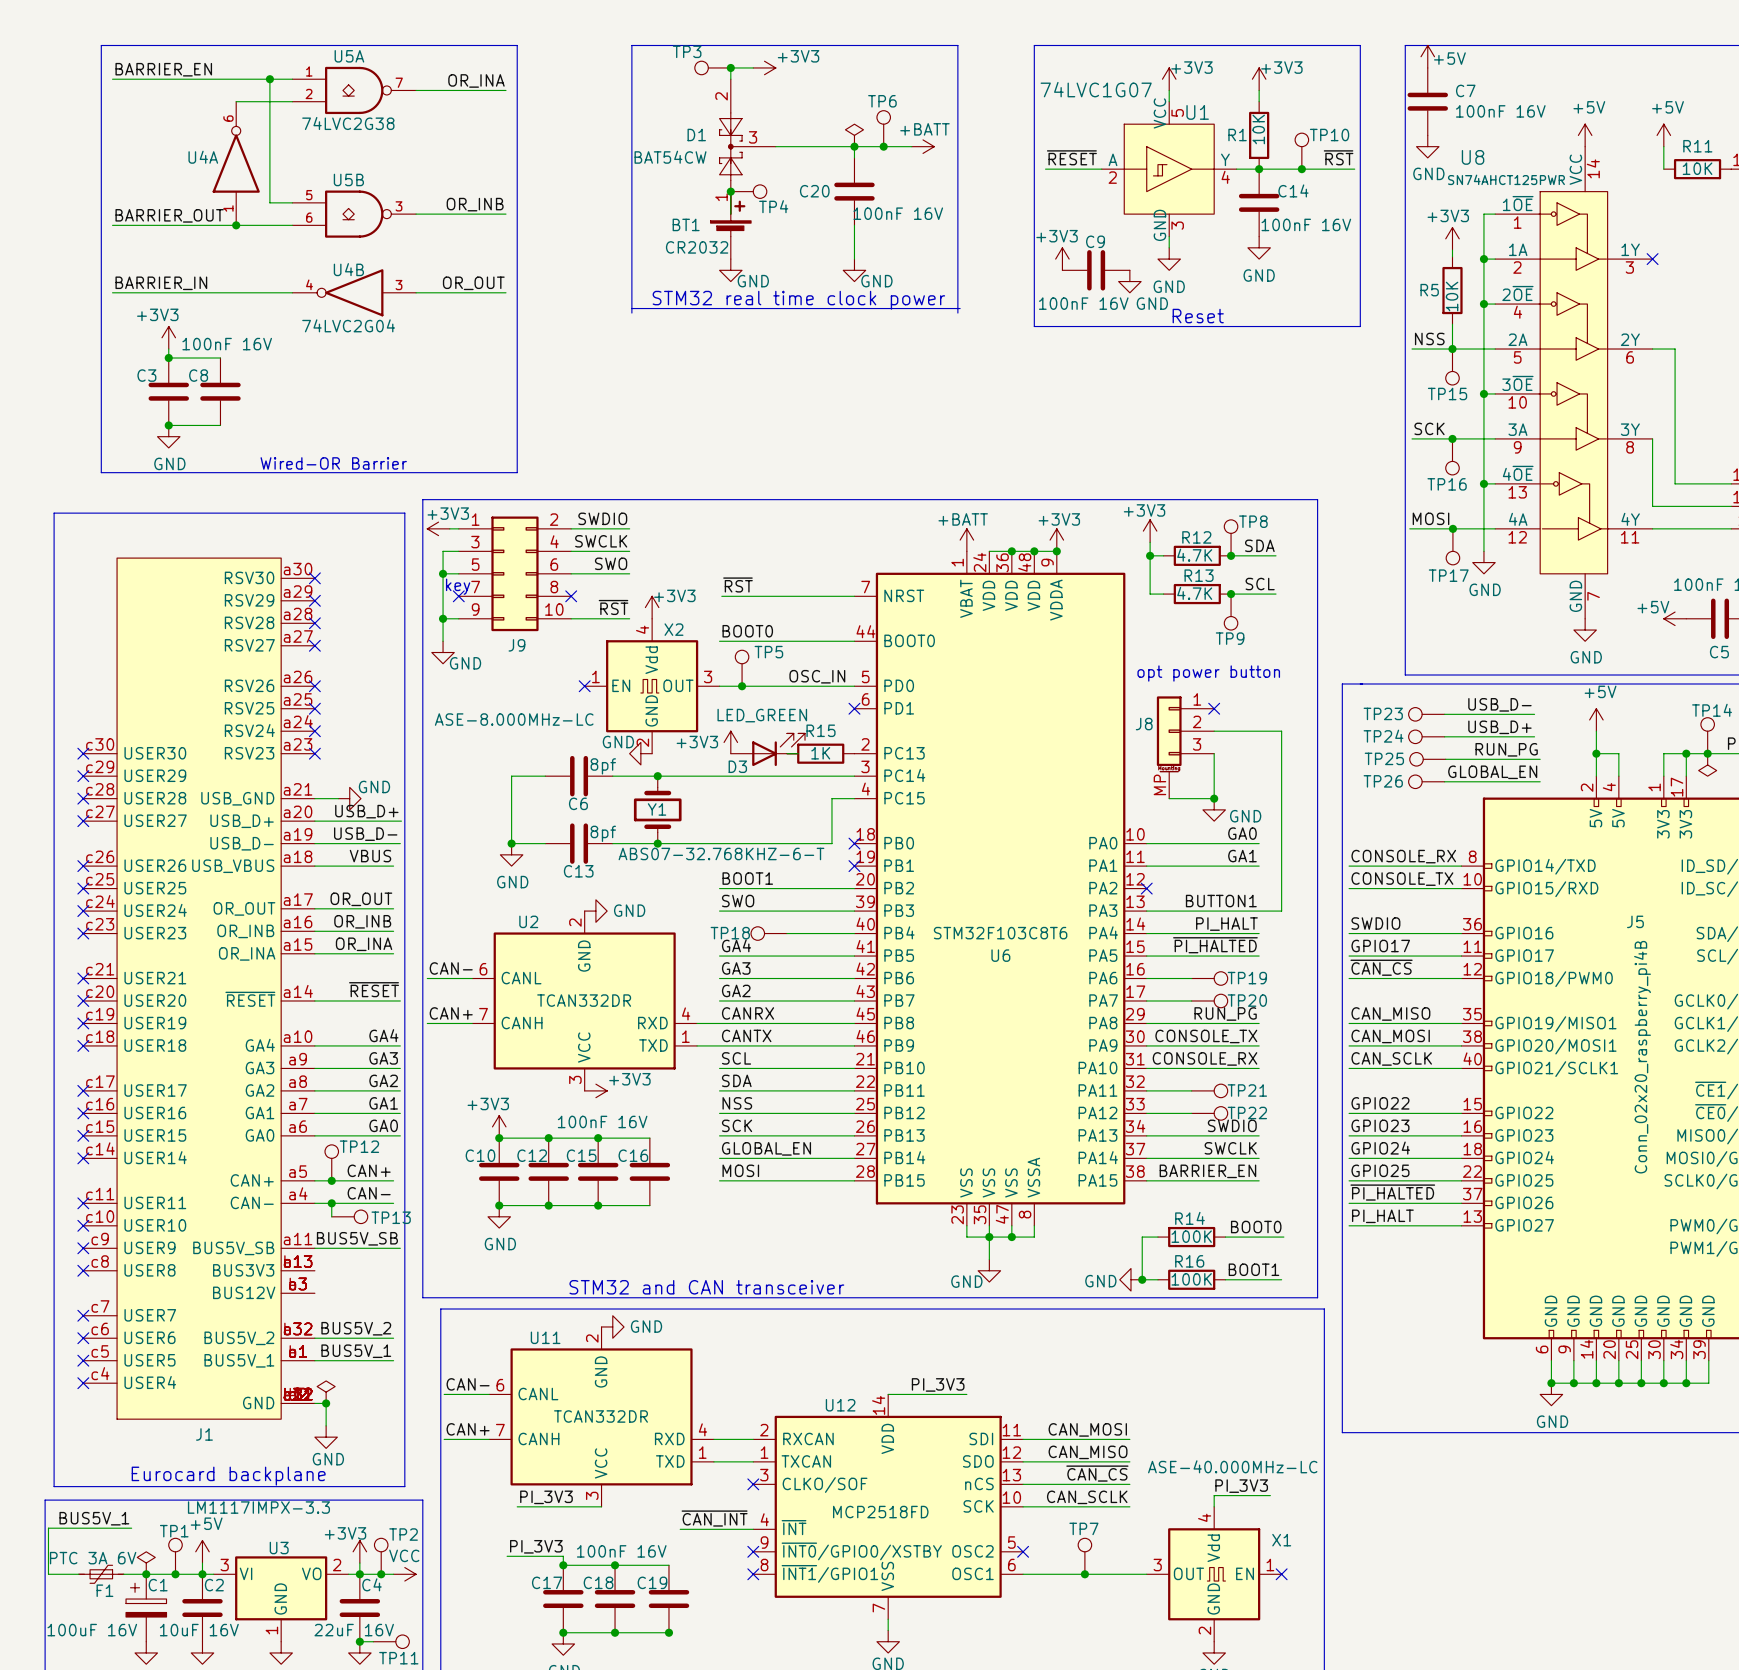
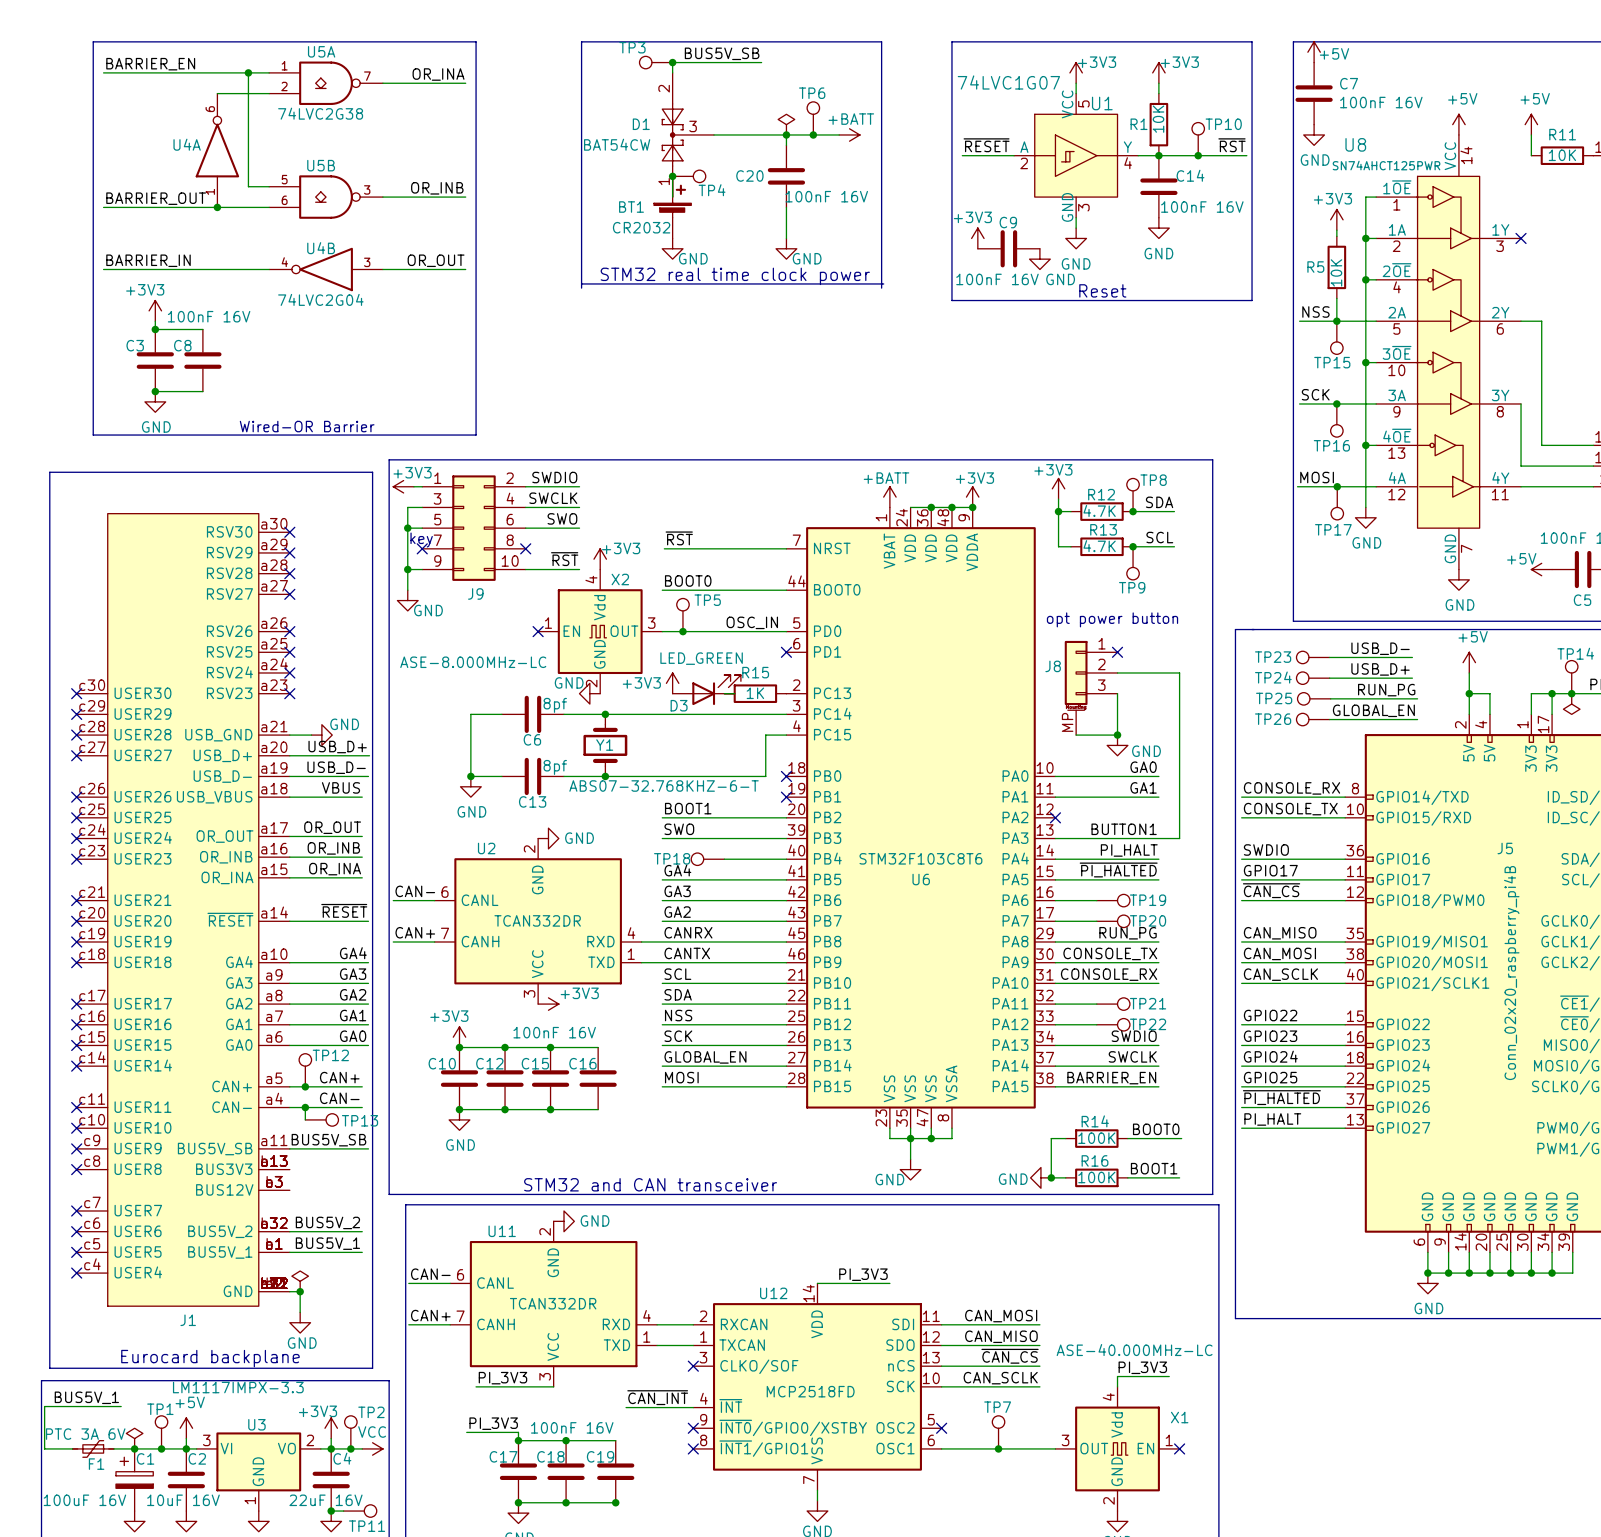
label: none -> BUS5V_SB (722, 53)
wire: none -> (693, 62) (761, 62)
power symbol: +3V3 (764, 67) -> none

